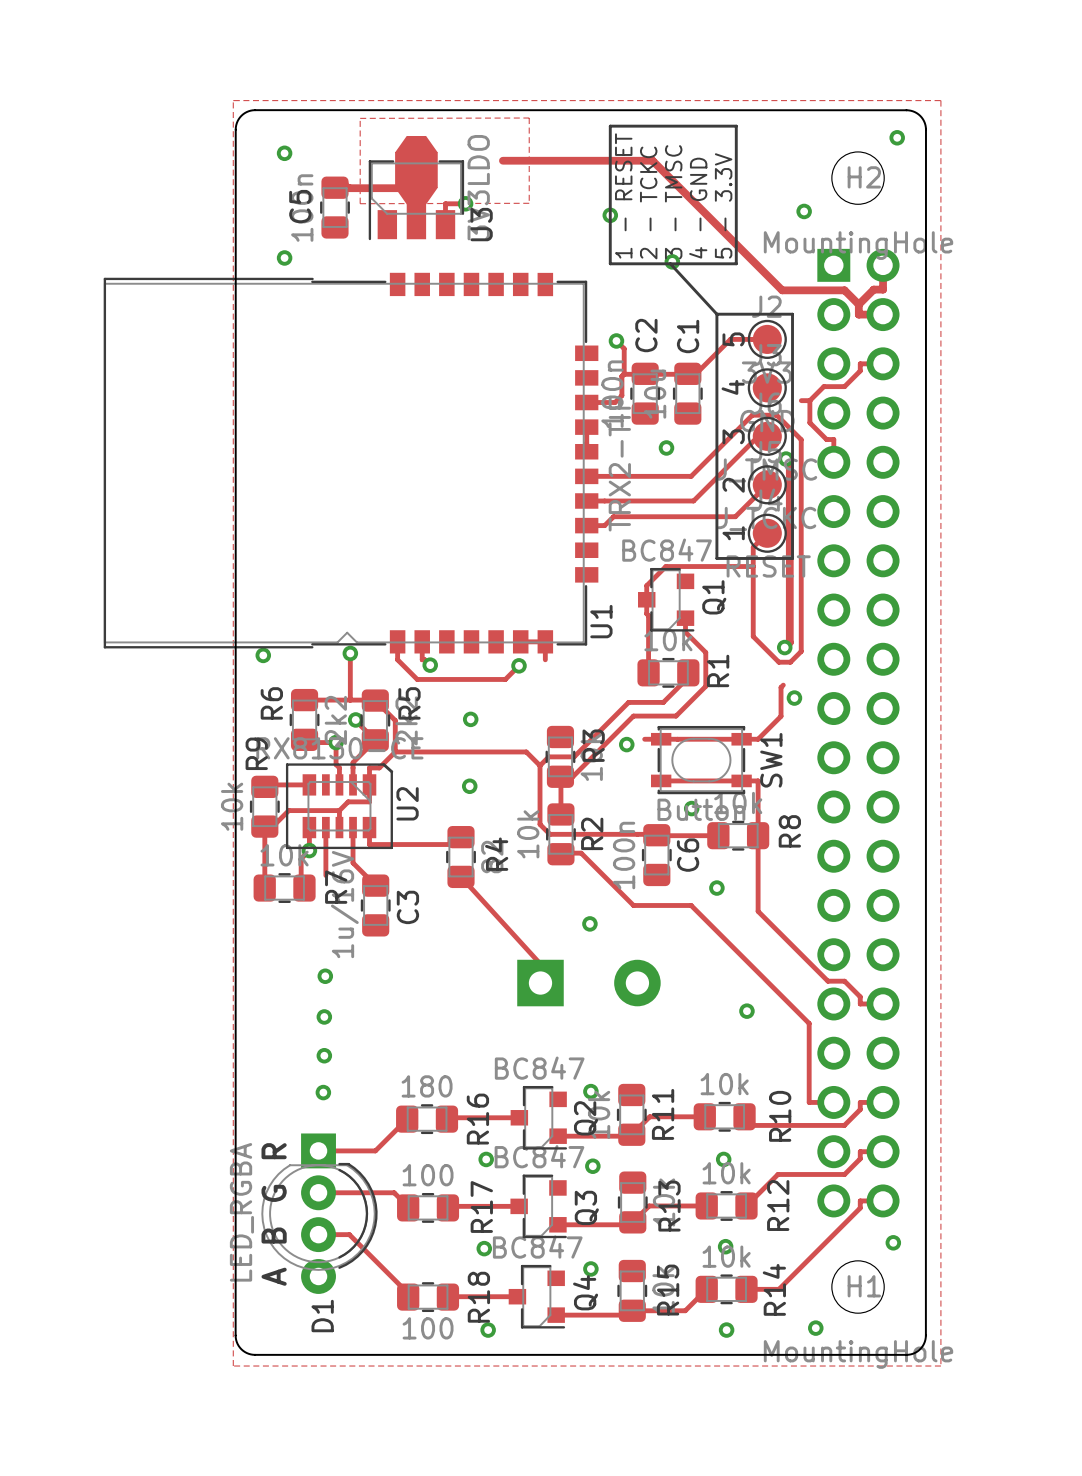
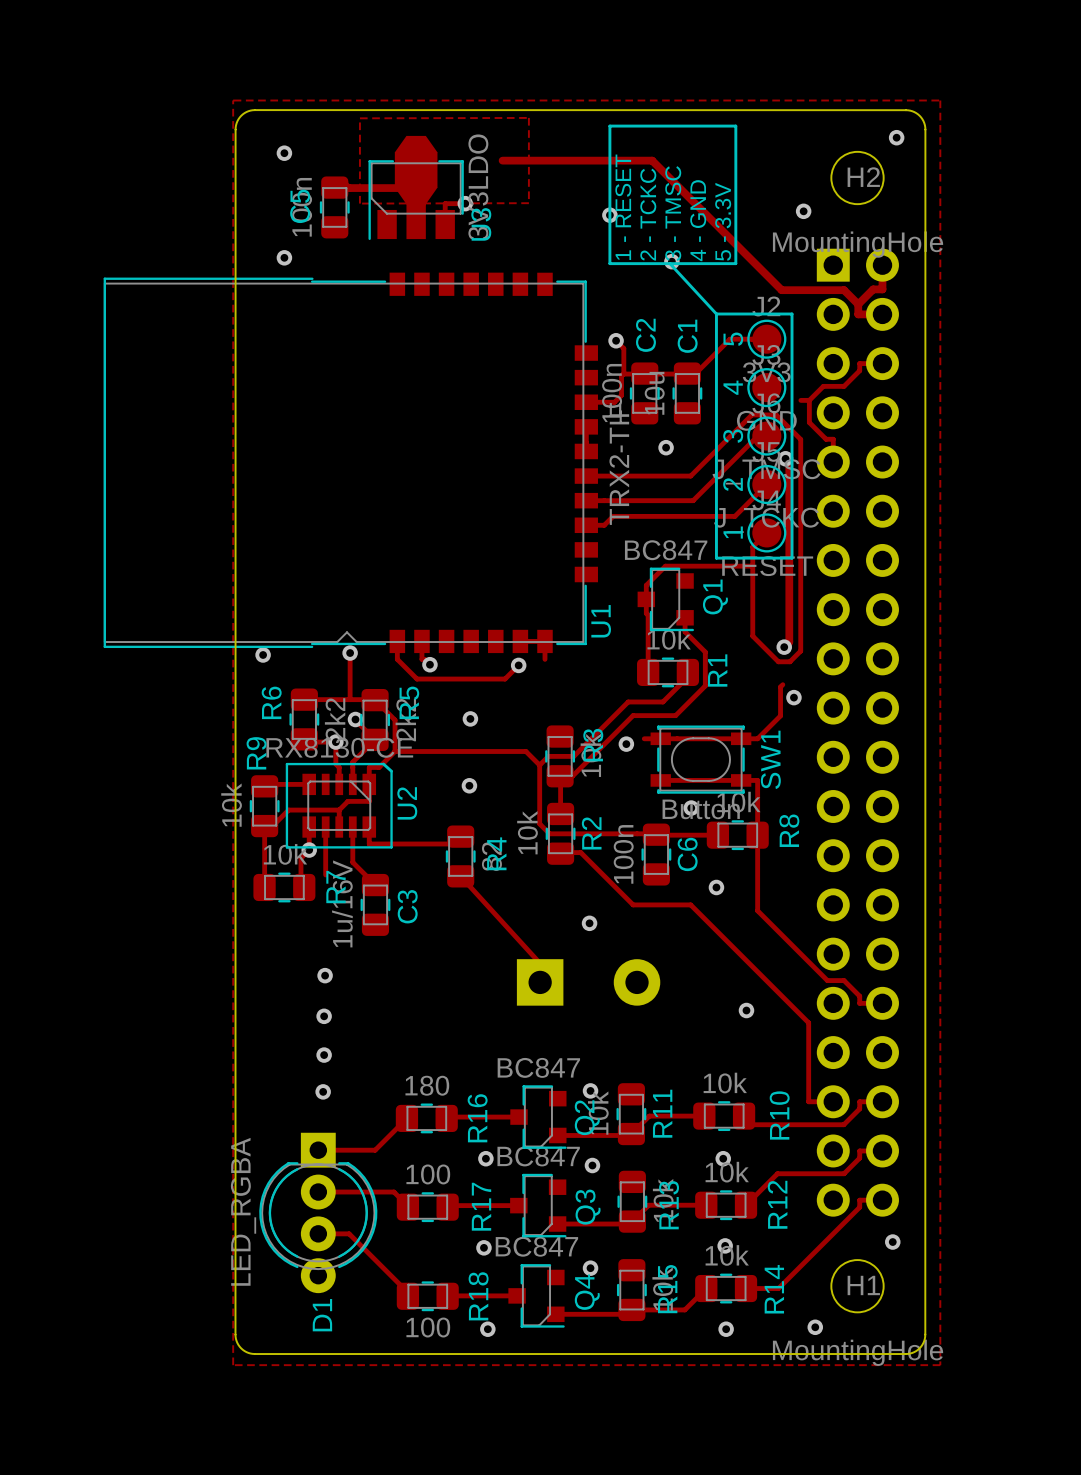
D1 footprint: [261, 1133, 378, 1294] -> [259, 1132, 378, 1294]
text: R (274, 1151) -> none
text: G (274, 1193) -> none
text: B (274, 1235) -> none
text: A (274, 1276) -> none

